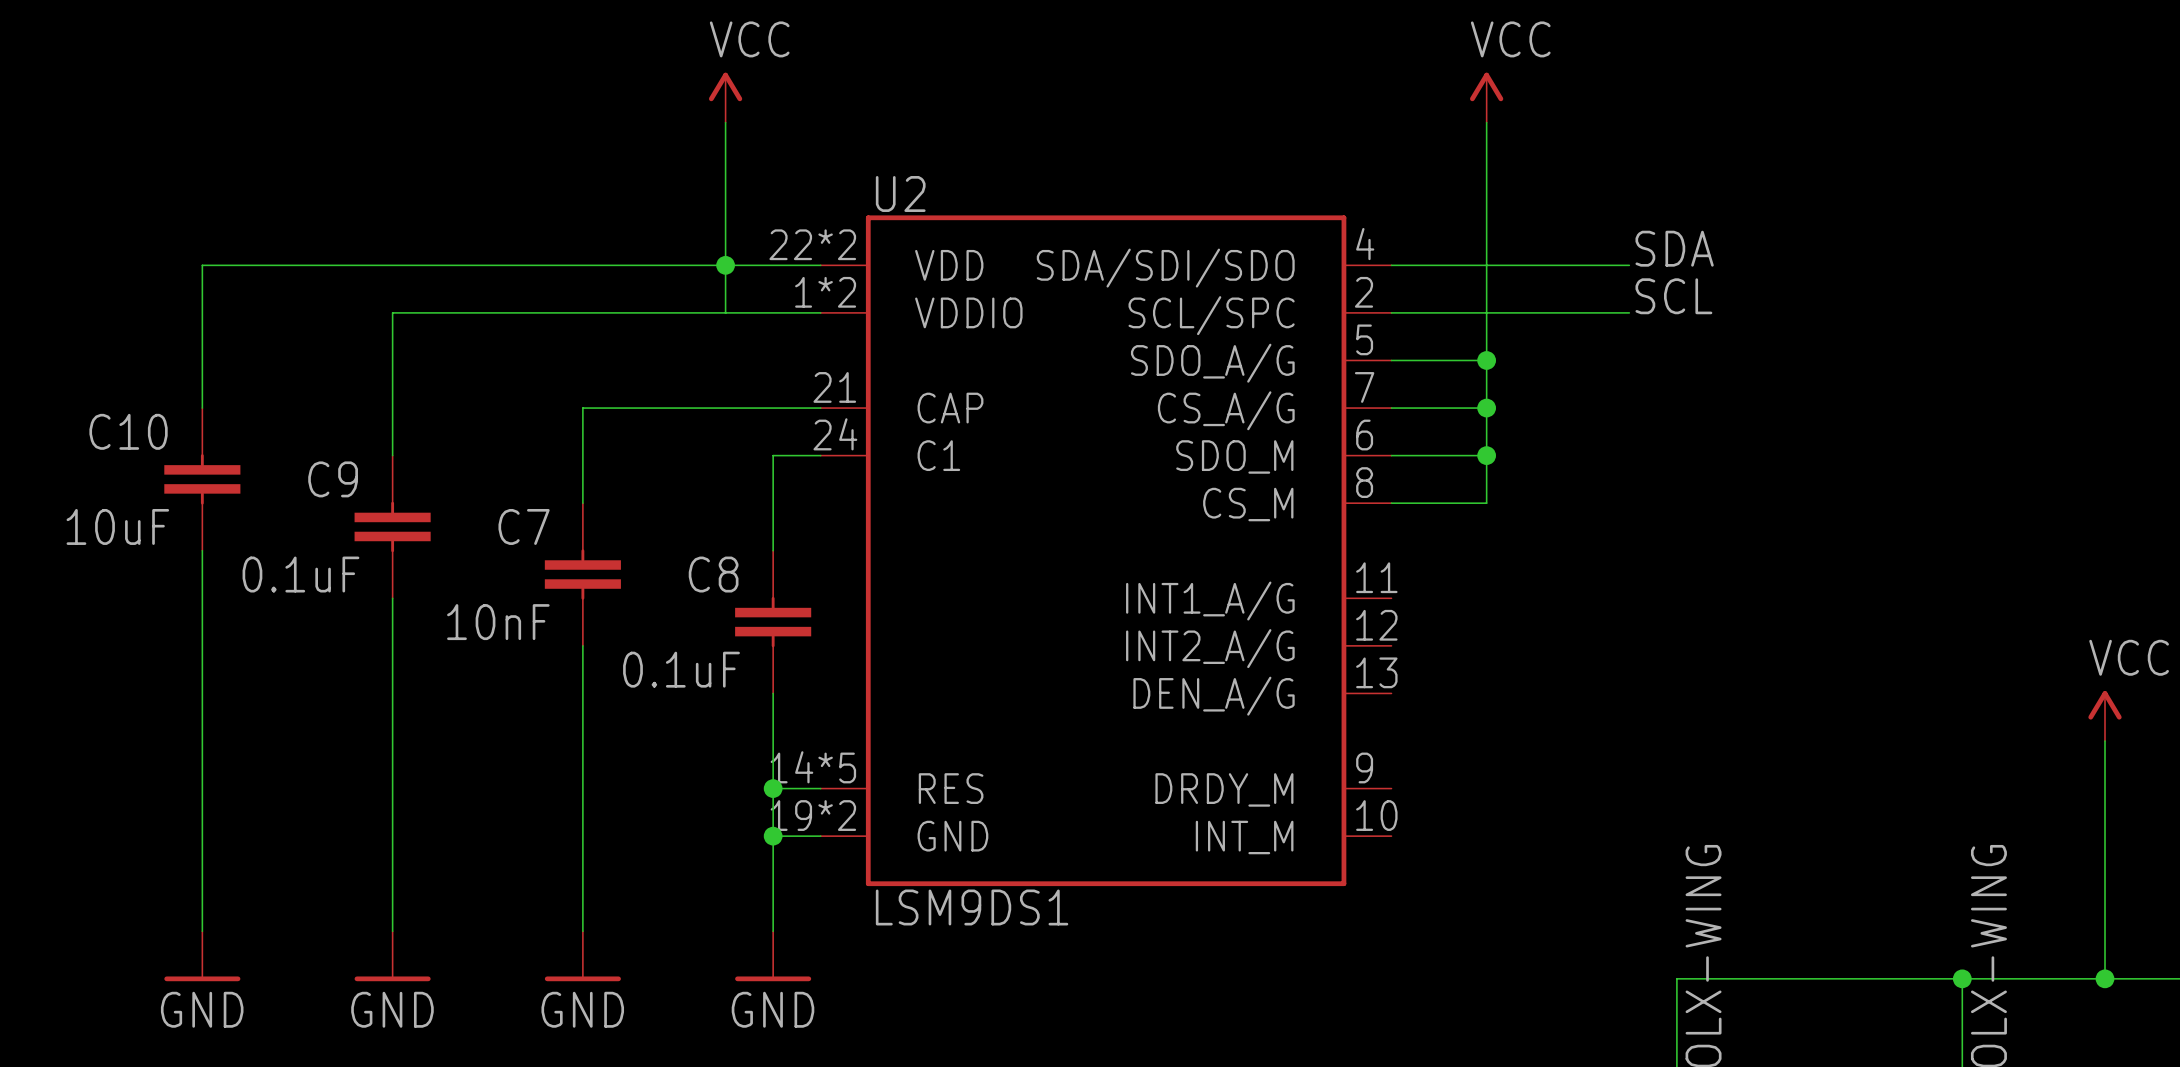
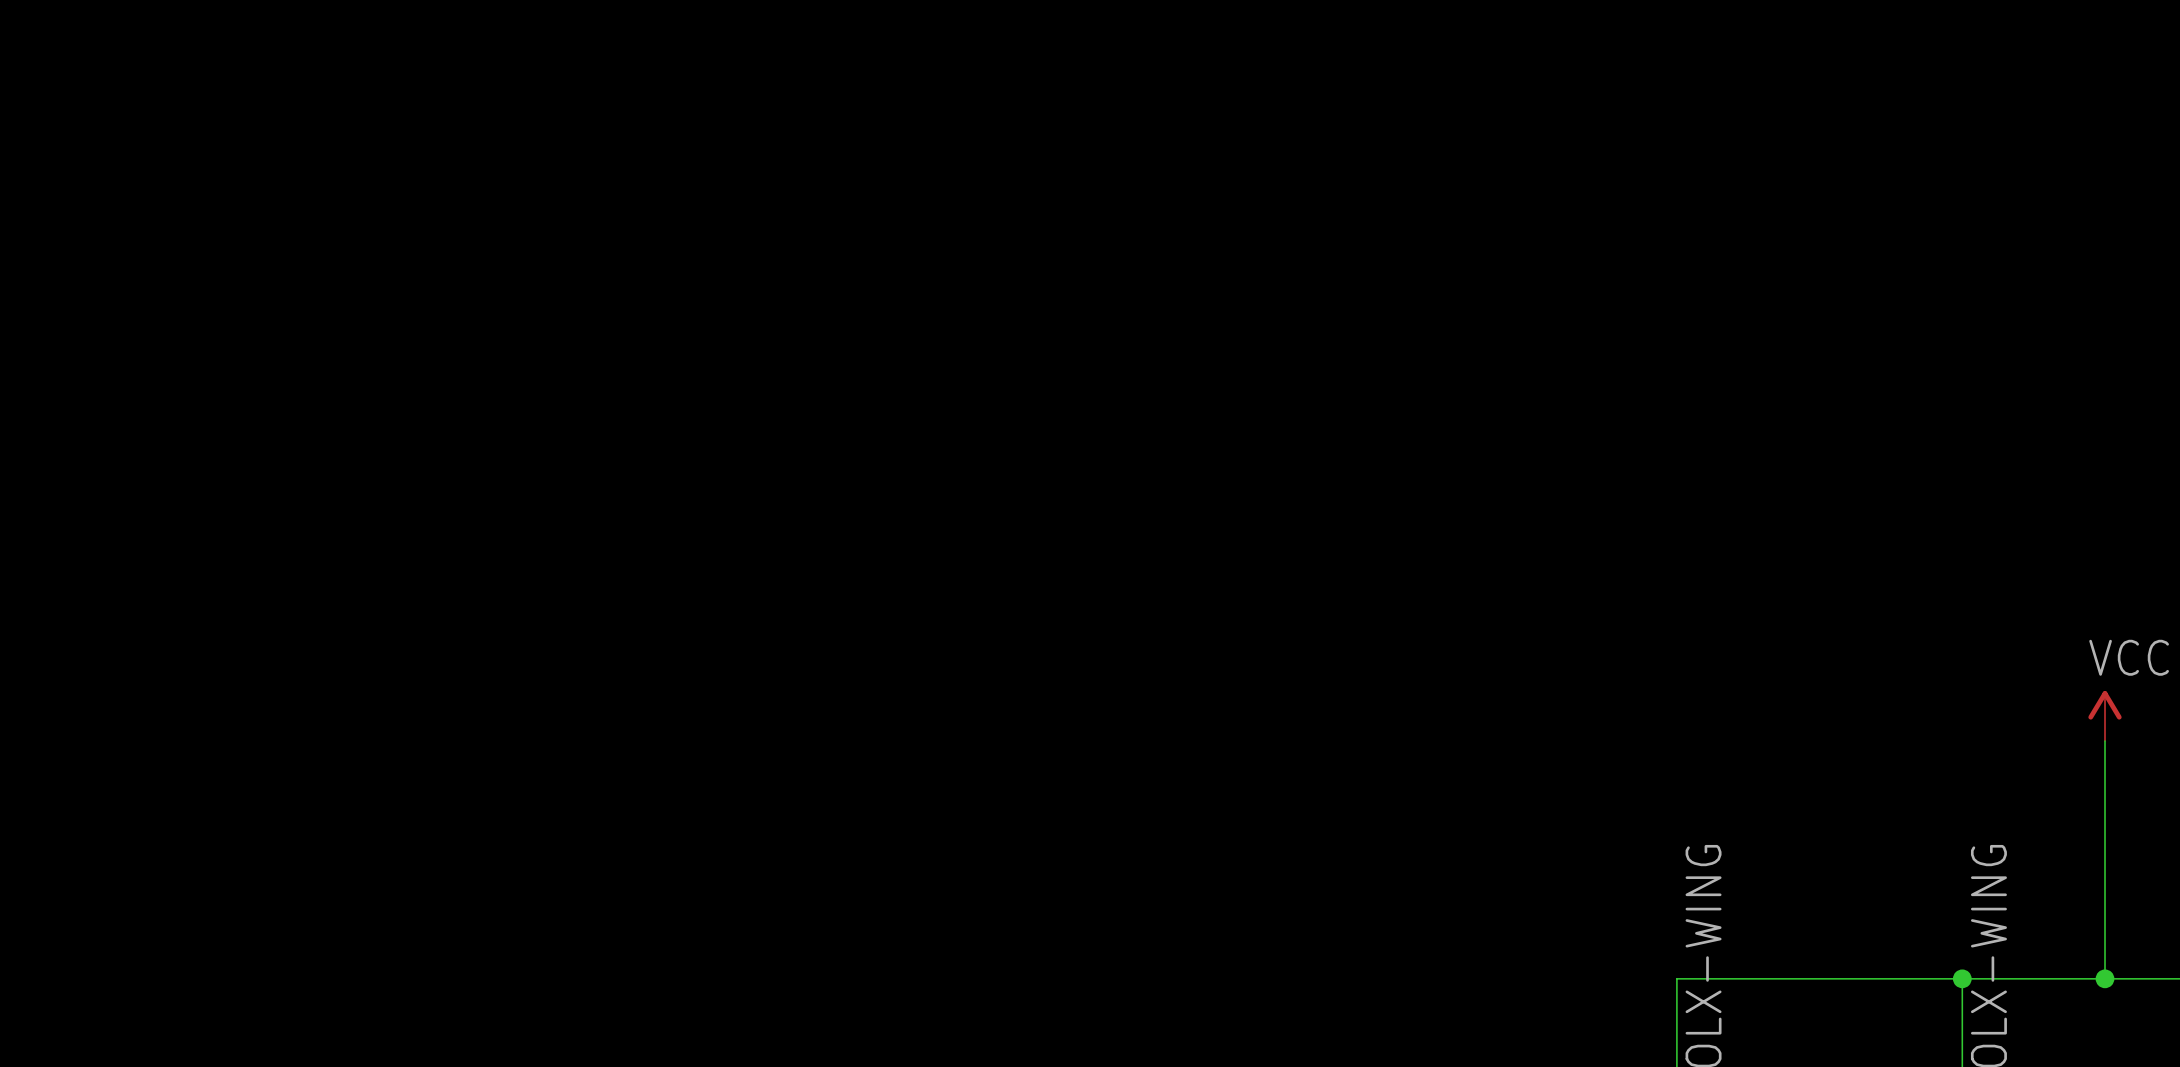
power symbol: VCC (725, 97) -> none
power symbol: VCC (1486, 97) -> none
wire: (725, 122) (725, 312) -> none
wire: (1486, 122) (1486, 503) (1391, 503) -> none
label: SDA (1674, 248) -> none
junction: (725, 265) -> none
wire: (820, 265) (202, 265) (202, 408) -> none
wire: (1391, 265) (1629, 265) -> none
label: SCL (1673, 296) -> none
wire: (820, 312) (392, 312) (392, 455) -> none
wire: (1391, 312) (1629, 312) -> none
wire: (1391, 360) (1486, 360) -> none
junction: (1486, 360) -> none
wire: (820, 408) (582, 408) (582, 503) -> none
wire: (1391, 408) (1486, 408) -> none
junction: (1486, 408) -> none
wire: (820, 455) (773, 455) (773, 550) -> none
wire: (1391, 455) (1486, 455) -> none
junction: (1486, 455) -> none
C10: 10uF (202, 479) -> none
C9: 0.1uF (392, 526) -> none
wire: (202, 550) (202, 931) -> none
U2: LSM9DS1 (1106, 550) -> none
C7: 10nF (582, 574) -> none
wire: (392, 598) (392, 931) -> none
C8: 0.1uF (773, 622) -> none
wire: (582, 645) (582, 931) -> none
wire: (773, 693) (773, 931) -> none
wire: (773, 788) (820, 788) -> none
junction: (773, 788) -> none
wire: (773, 836) (820, 836) -> none
junction: (773, 836) -> none
power symbol: GND (202, 956) -> none
power symbol: GND (392, 956) -> none
power symbol: GND (582, 956) -> none
power symbol: GND (773, 956) -> none

